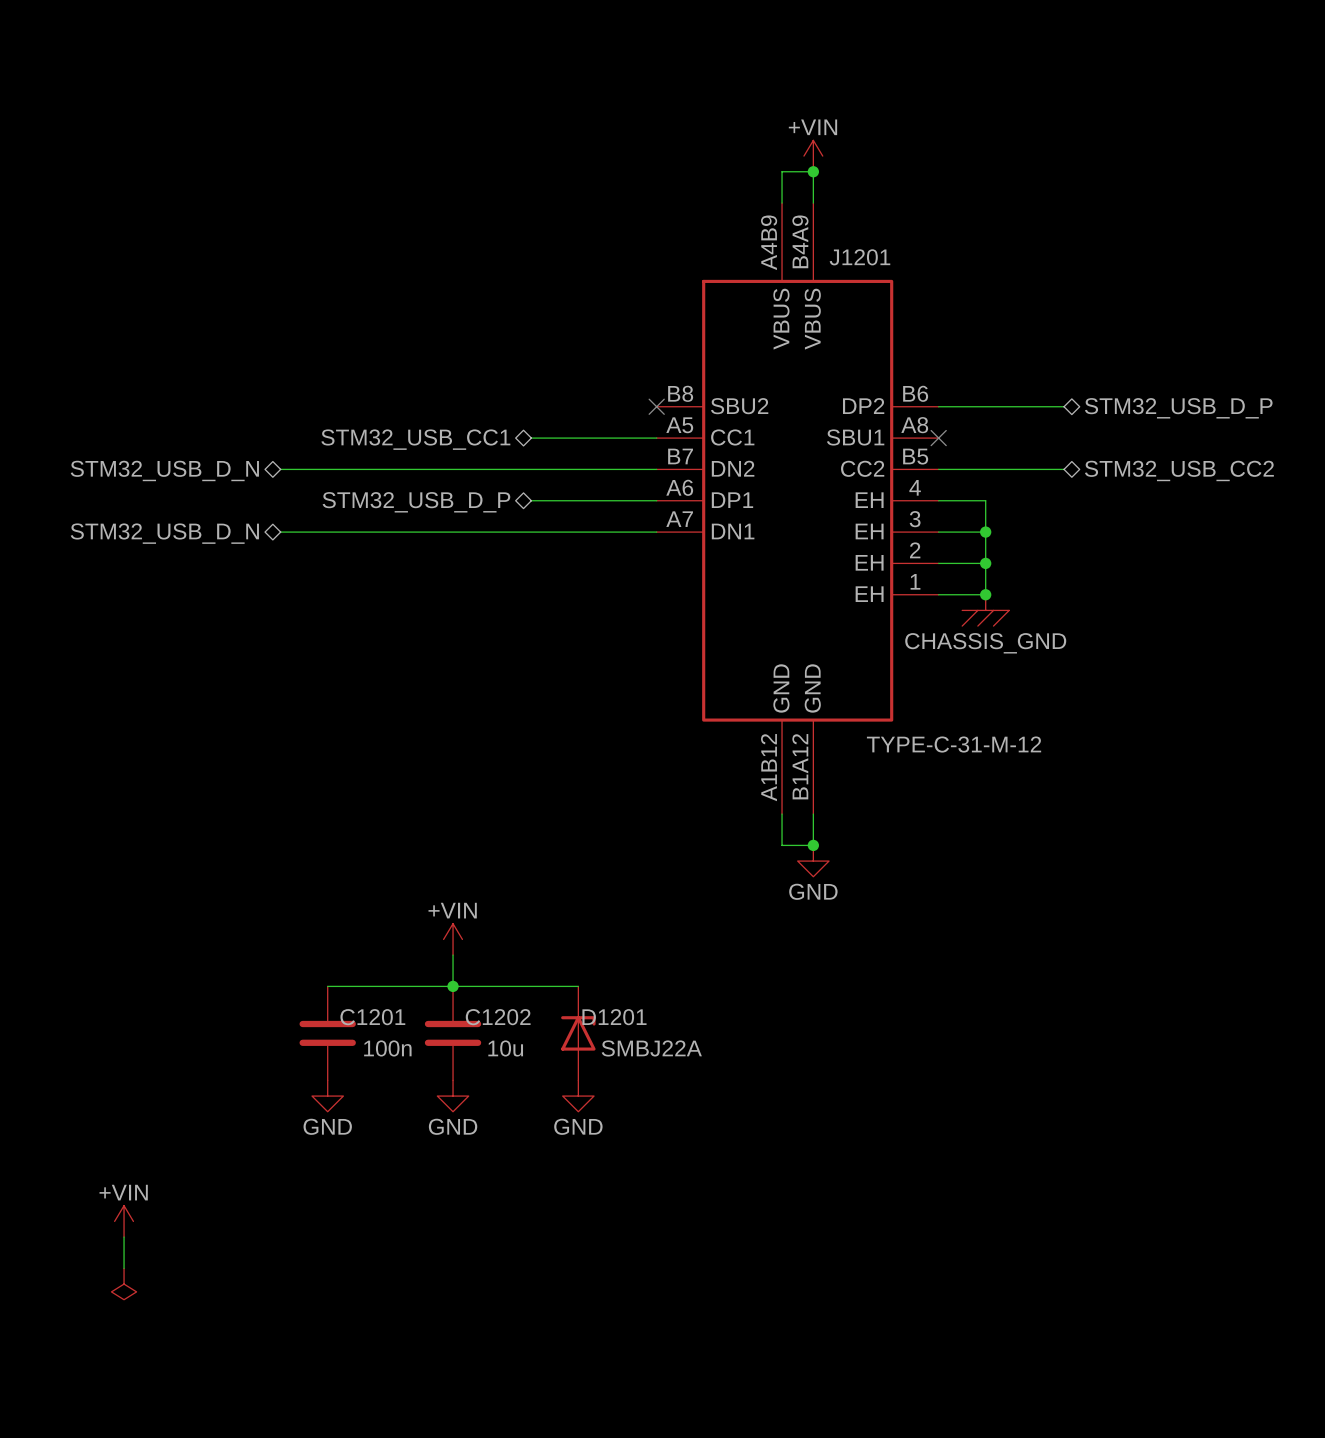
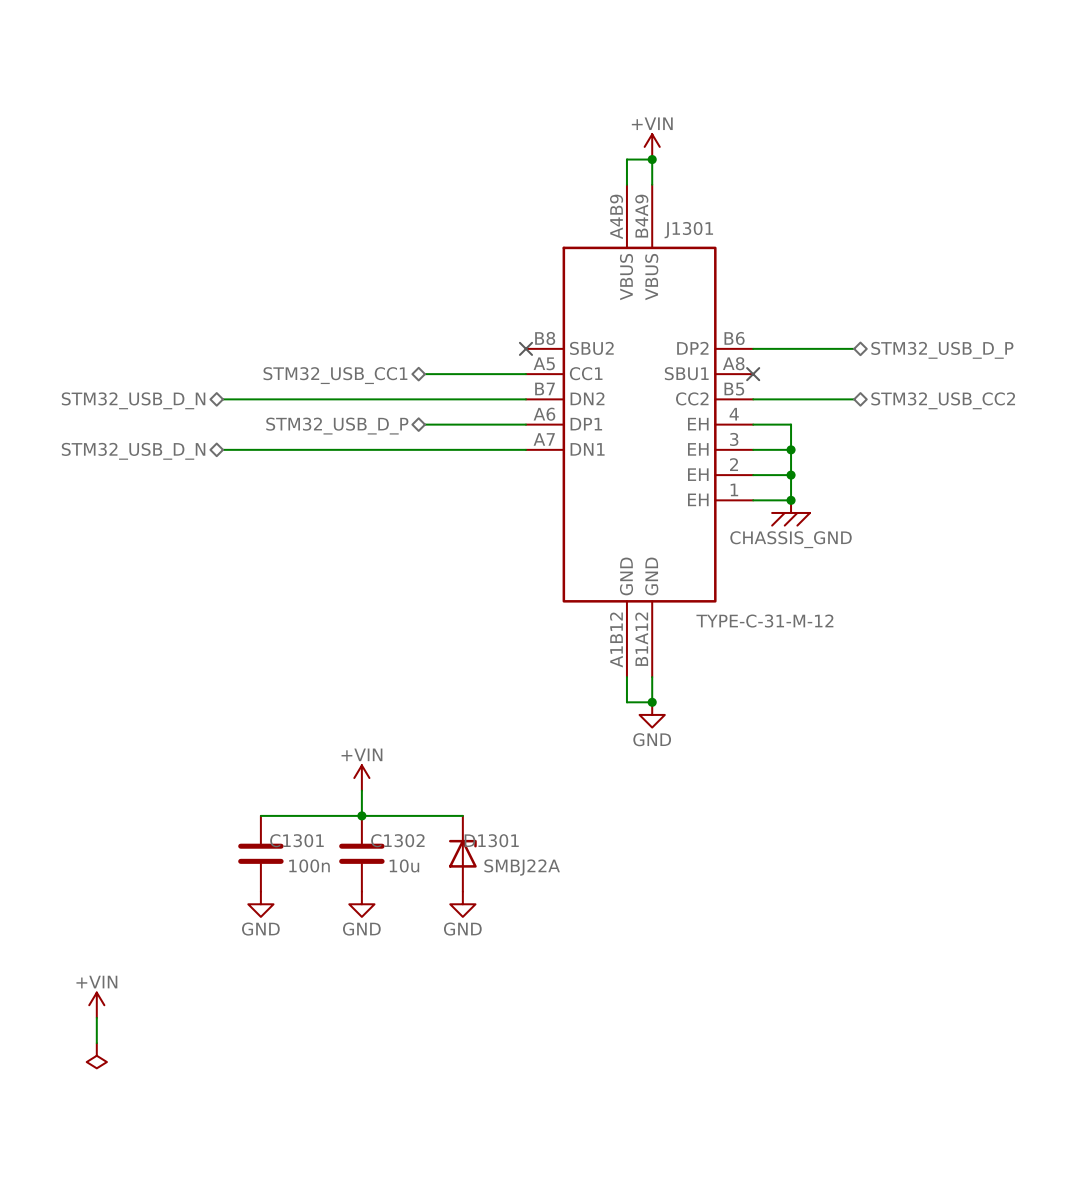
J1201 name: J1201 (859, 257) -> J1301 (688, 230)
C1201 name: C1201 (372, 1017) -> C1301 (296, 840)
C1202 name: C1202 (498, 1017) -> C1302 (397, 840)
D1201 name: D1201 (614, 1017) -> D1301 (491, 840)

